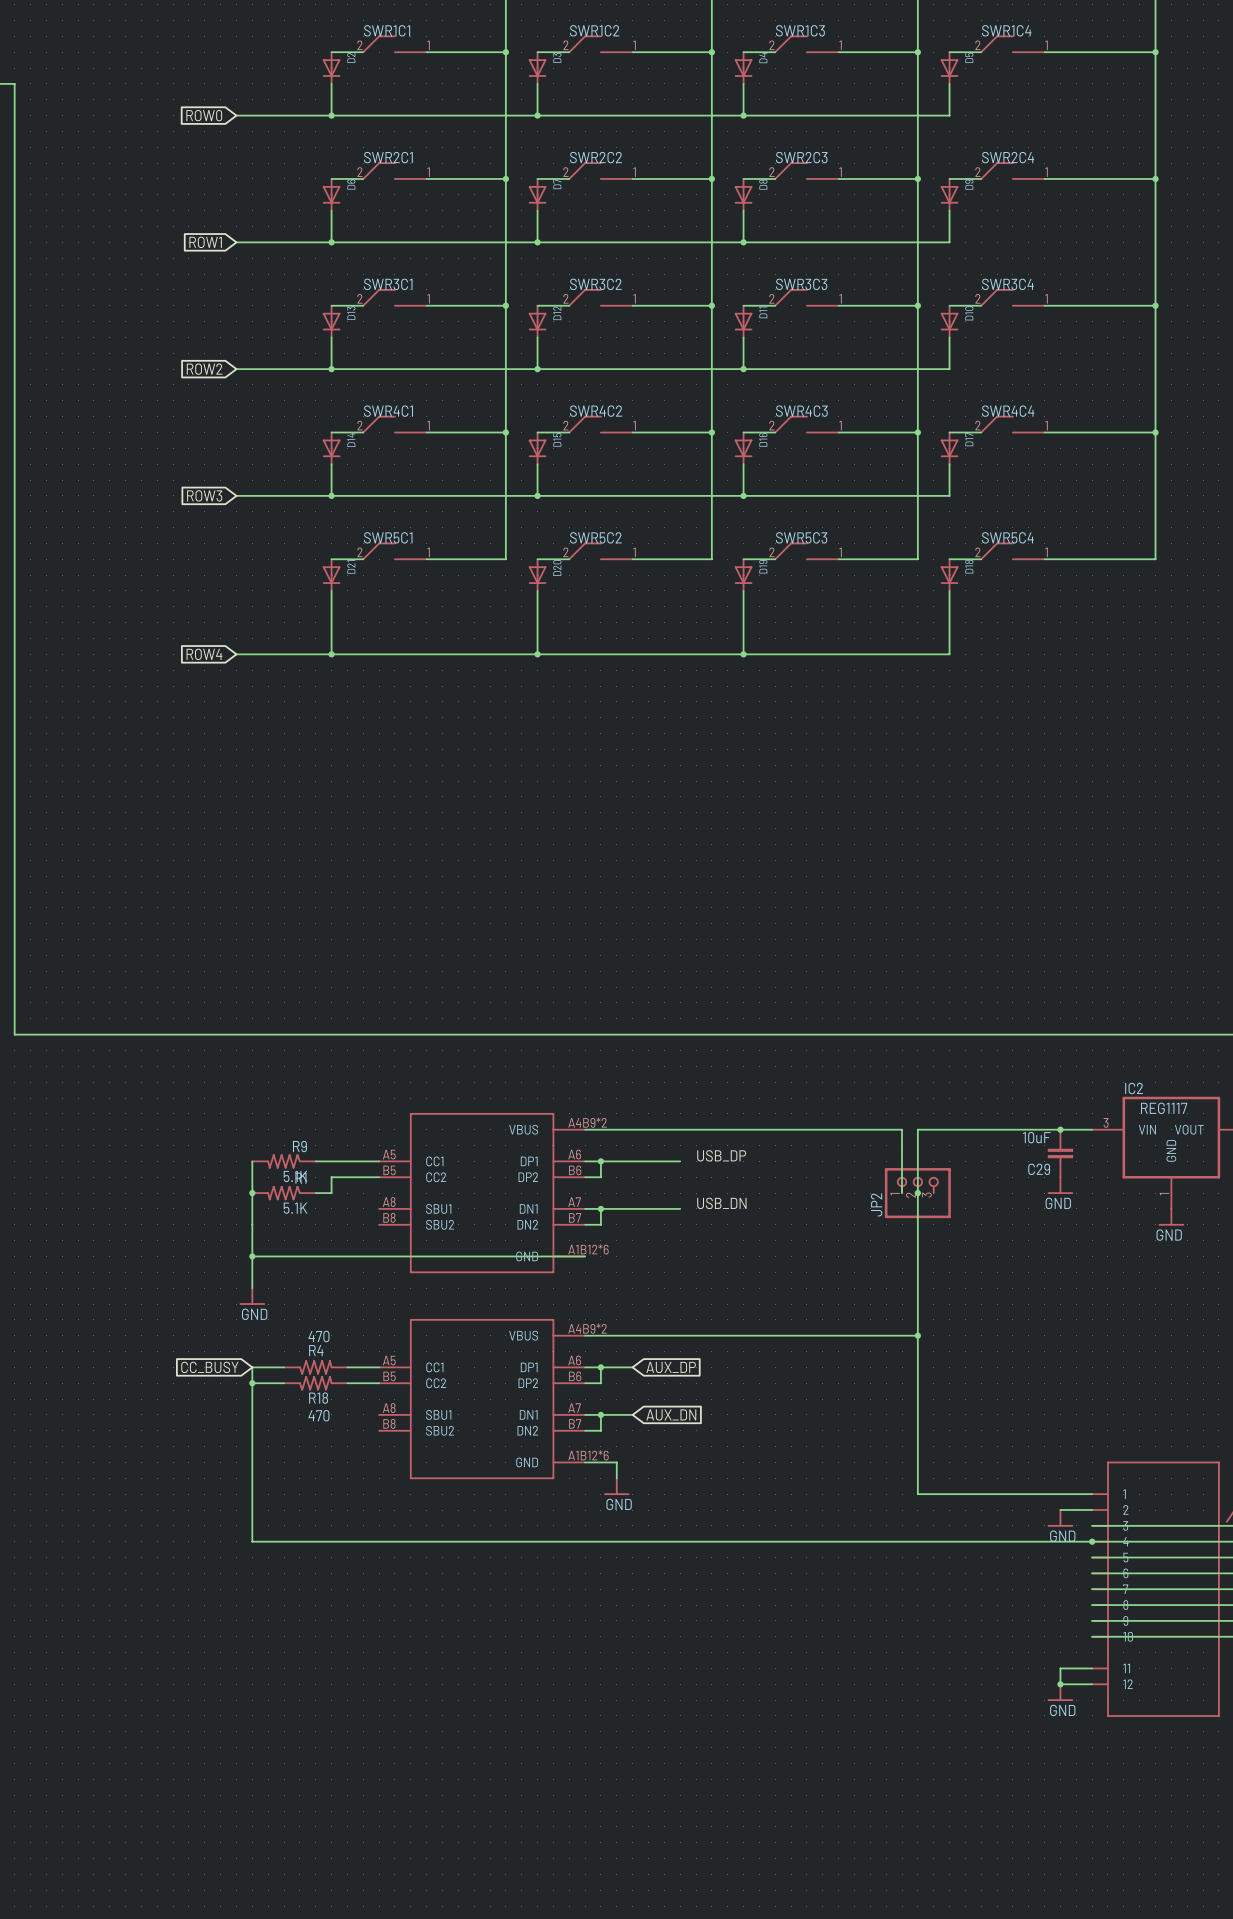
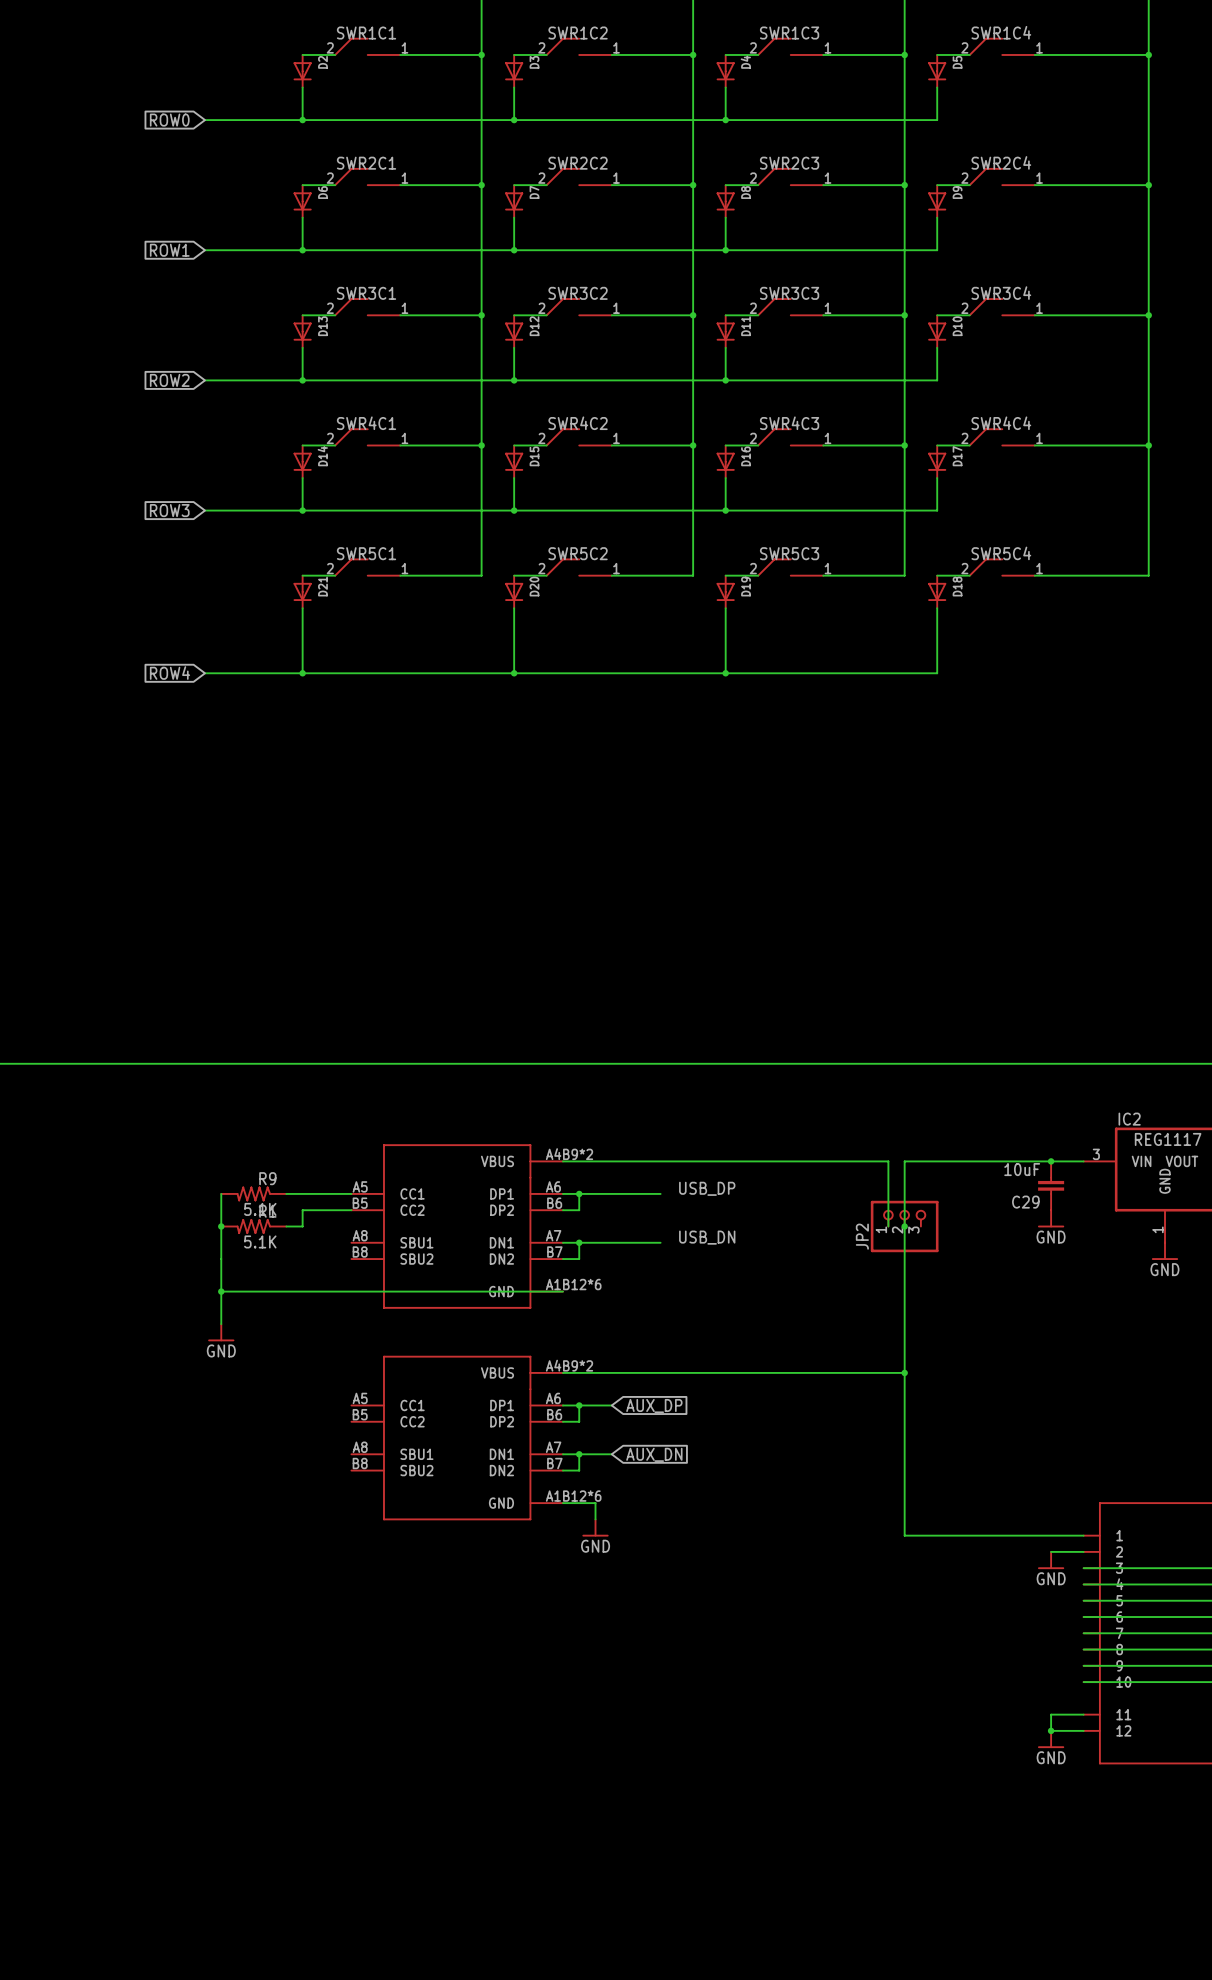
global label: CC_BUSY (209, 1367) -> none
wire: (284, 1367) (252, 1367) (252, 1541) (1092, 1541) -> none
R4: 470 (315, 1367) -> none
wire: (347, 1367) (379, 1367) -> none
wire: (252, 1383) (284, 1383) -> none
junction: (252, 1383) -> none
R18: 470 (315, 1383) -> none
wire: (347, 1383) (379, 1383) -> none
junction: (1092, 1541) -> none

